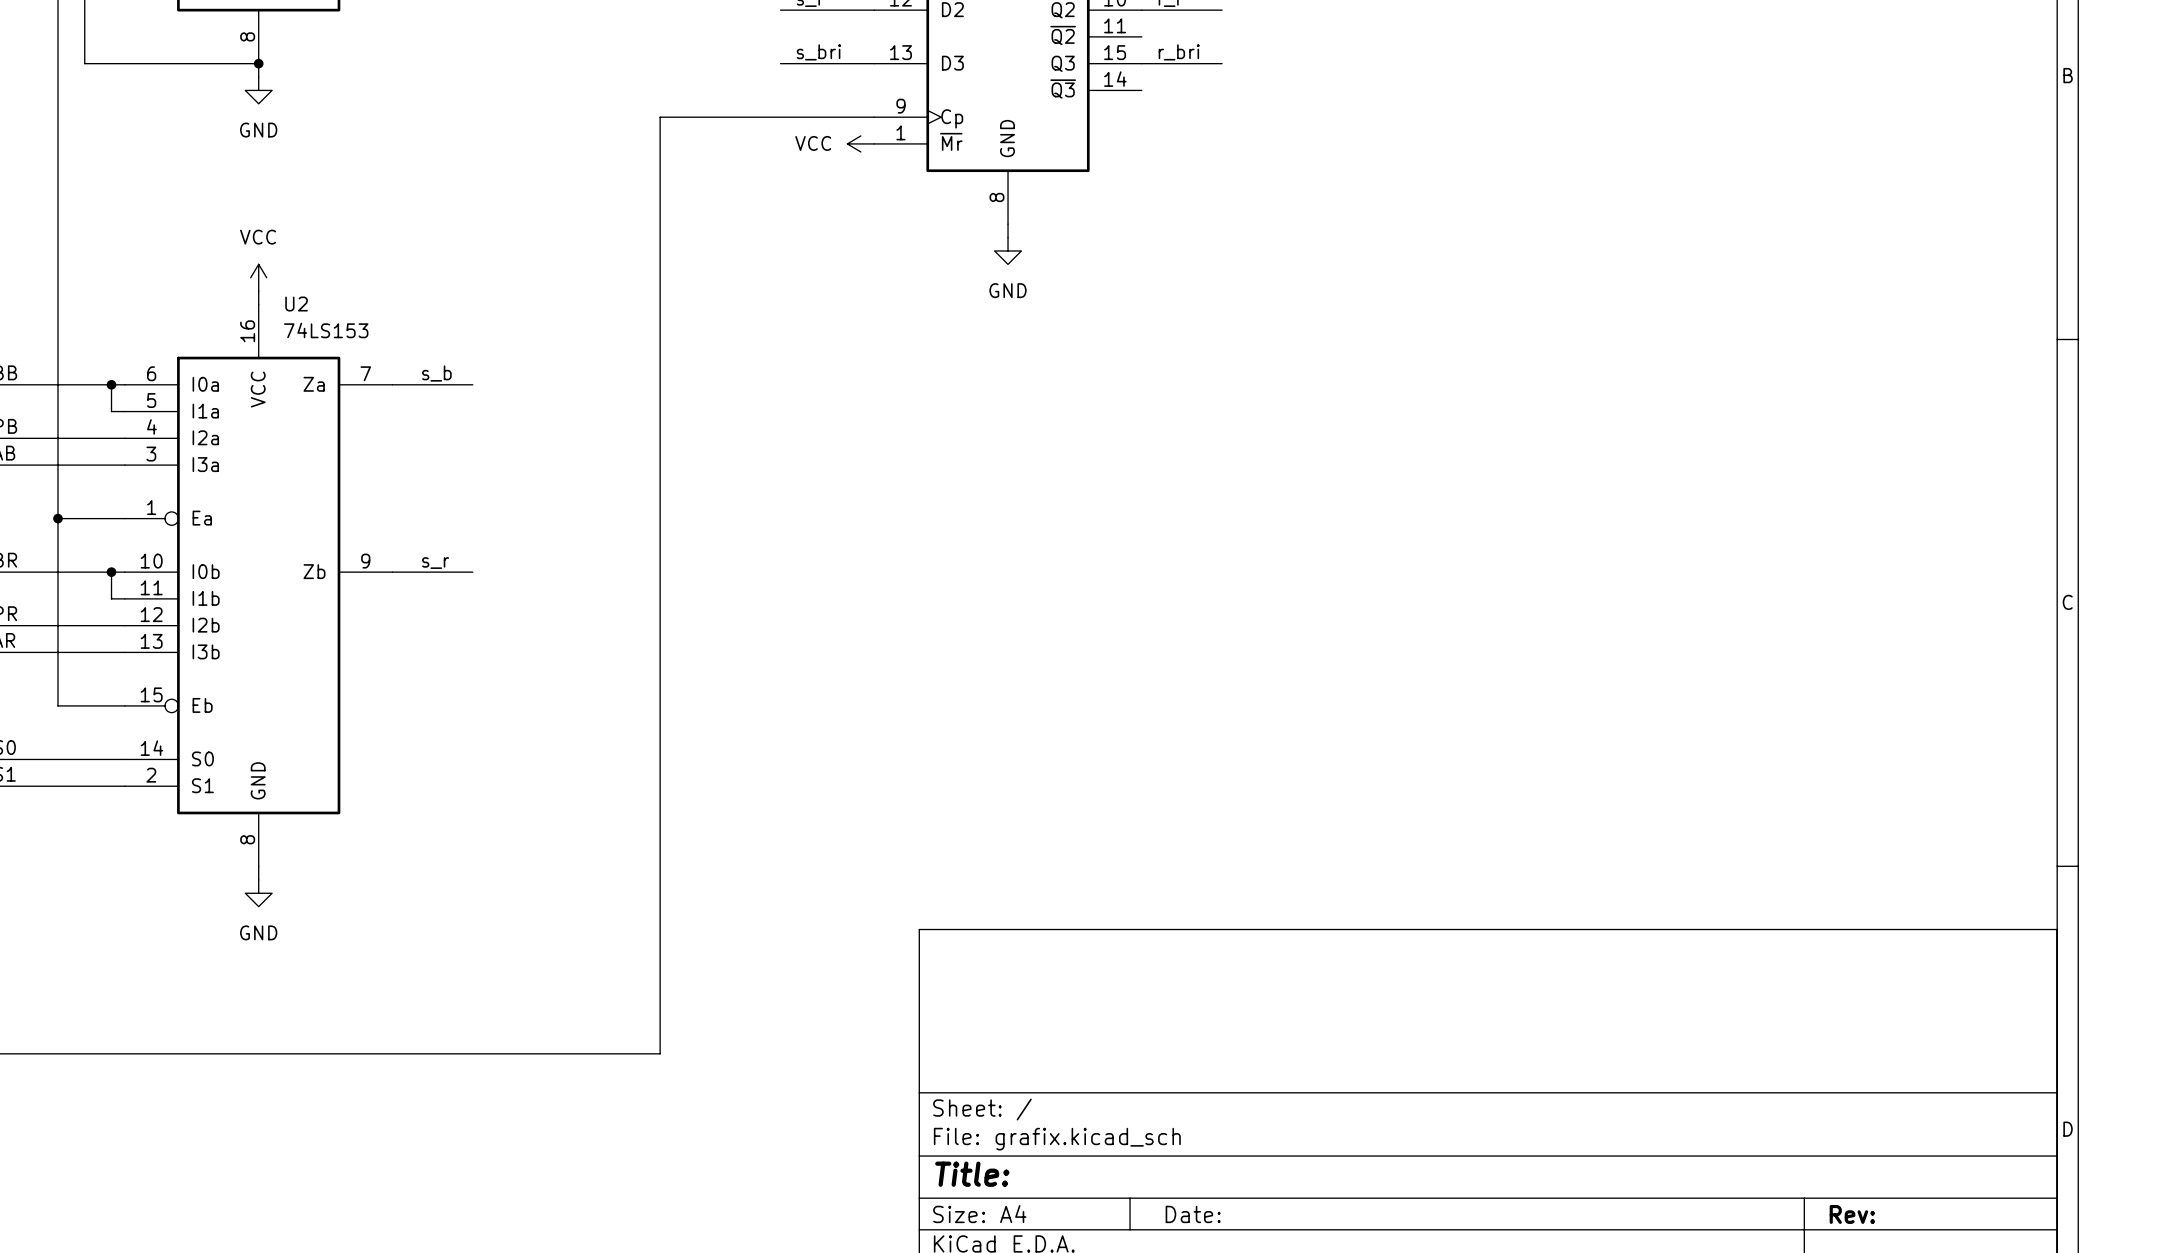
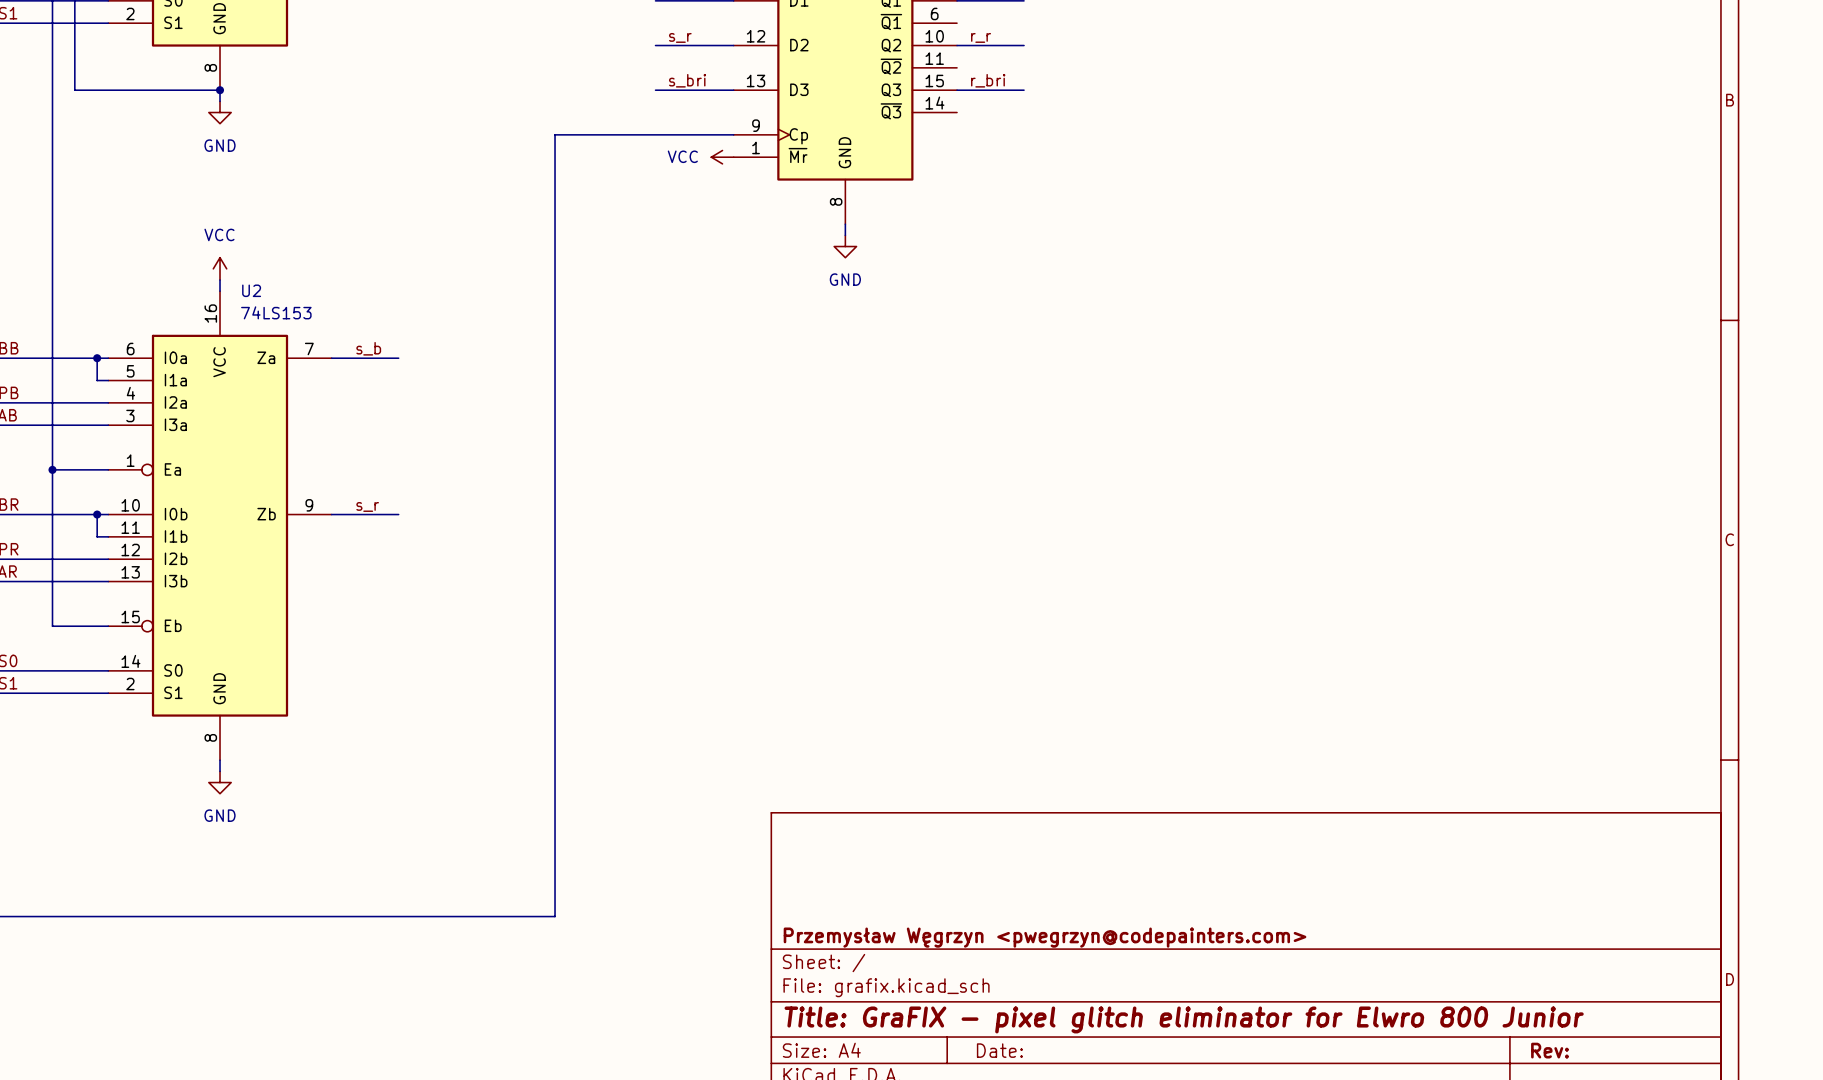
title block: none -> Przemysław Węgrzyn <pwegrzyn@codepainters.com> (1045, 937)
title block: Title: (972, 1174) -> Title: GraFIX - pixel glitch eliminator for Elwro 800 Junior (1184, 1019)

